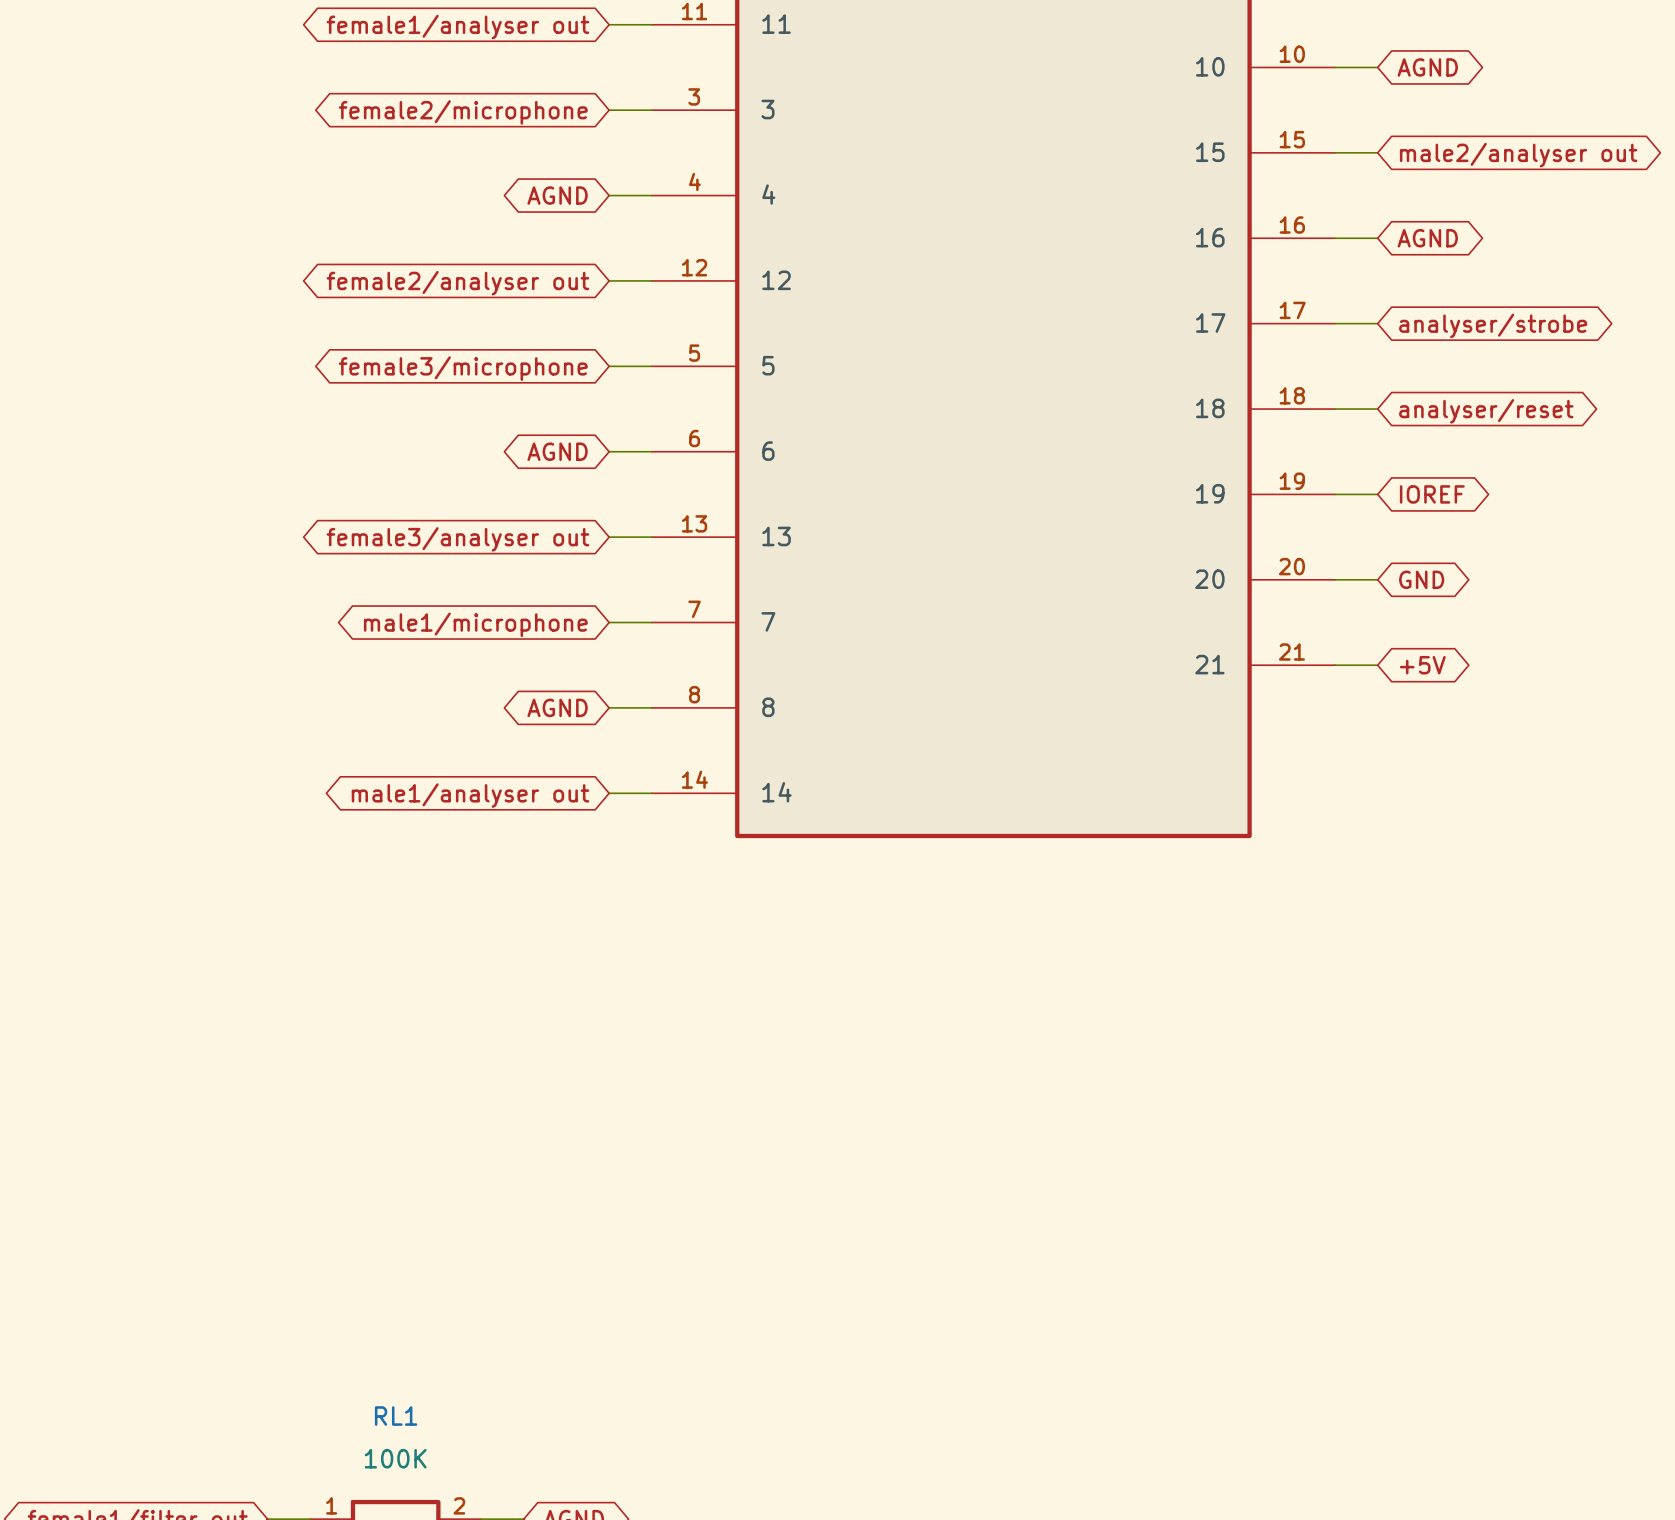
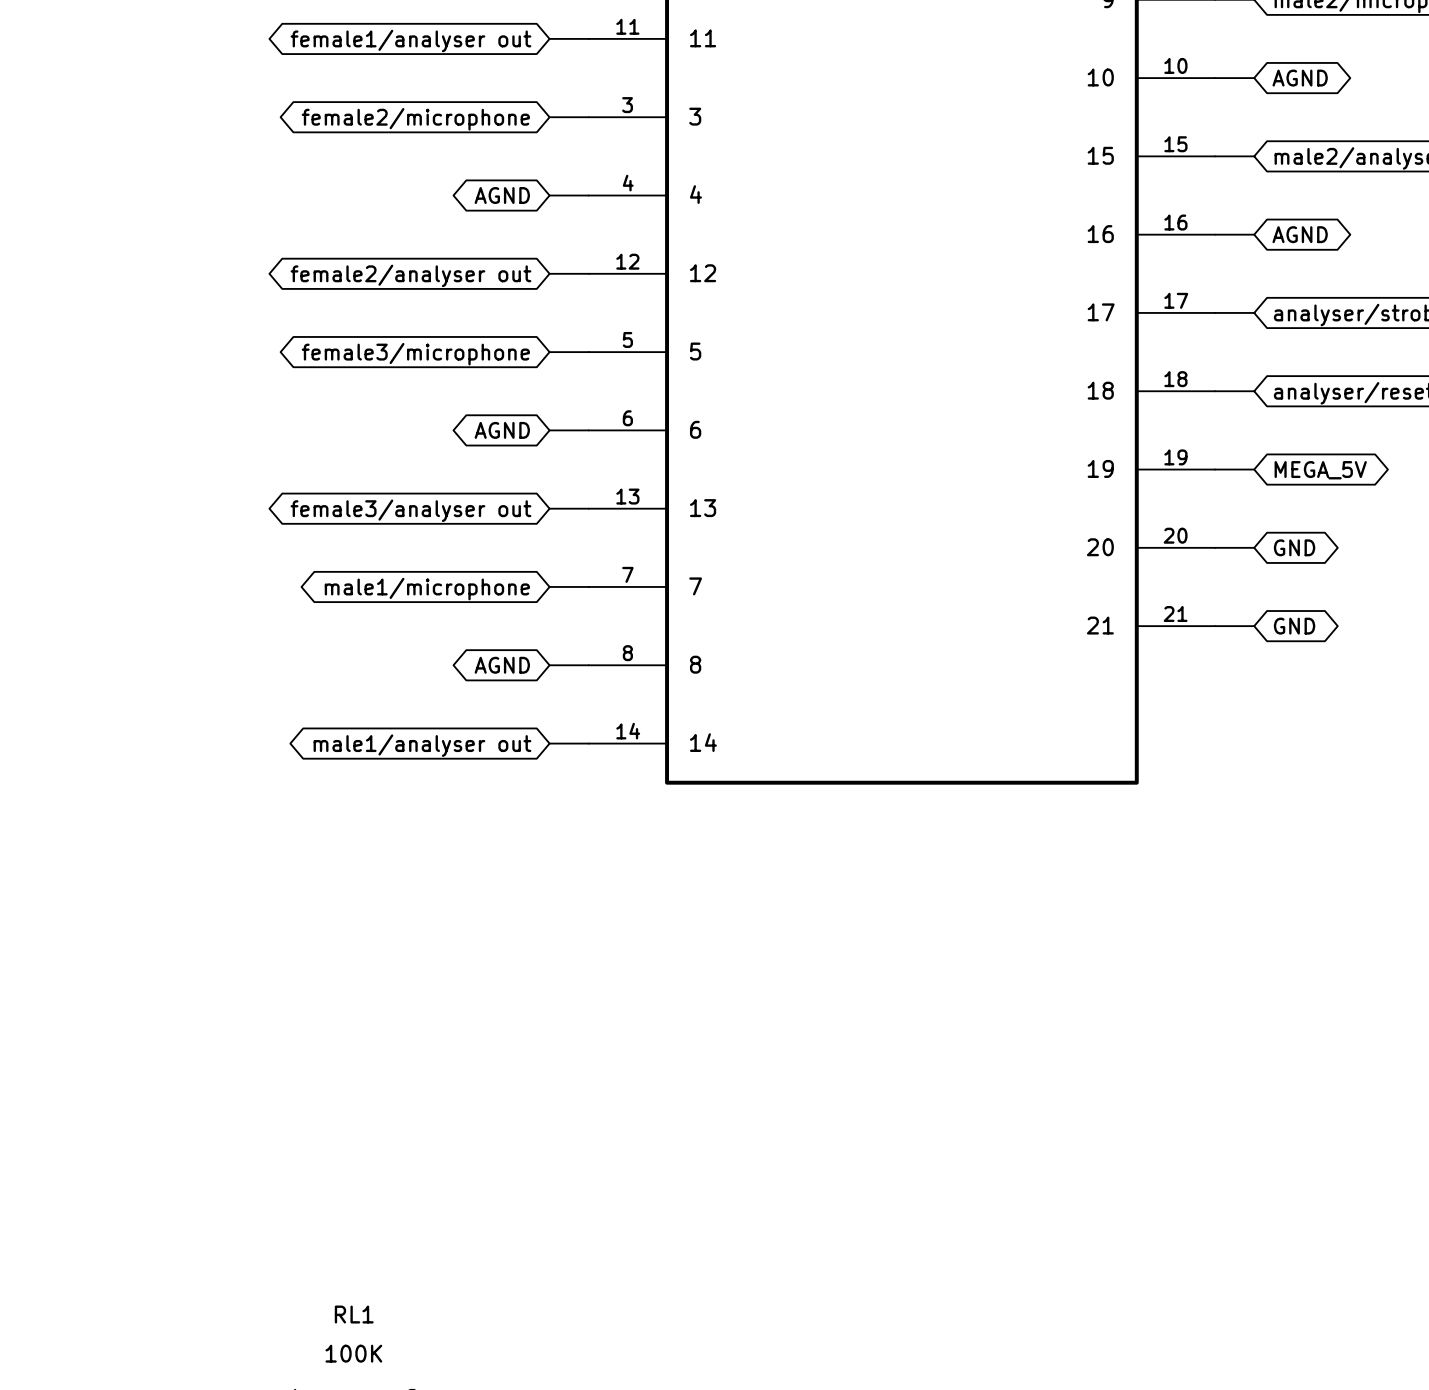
global label: IOREF (1432, 494) -> MEGA_5V (1320, 470)
global label: +5V (1422, 665) -> GND (1294, 626)

